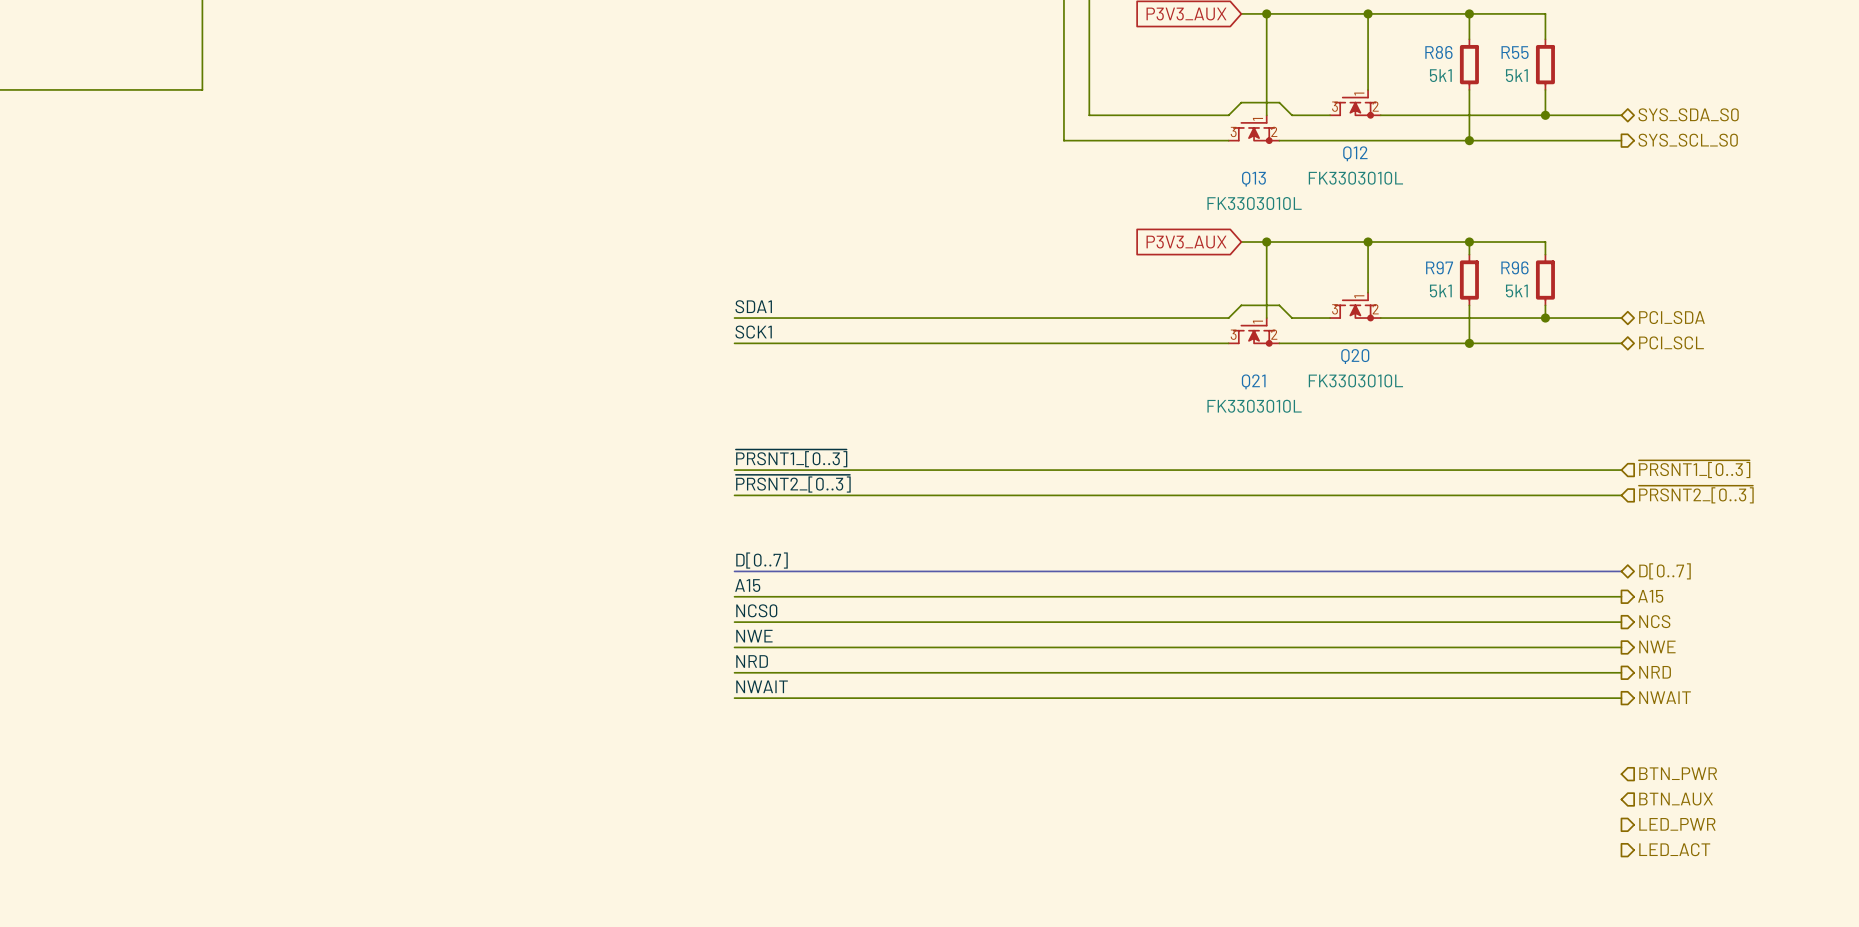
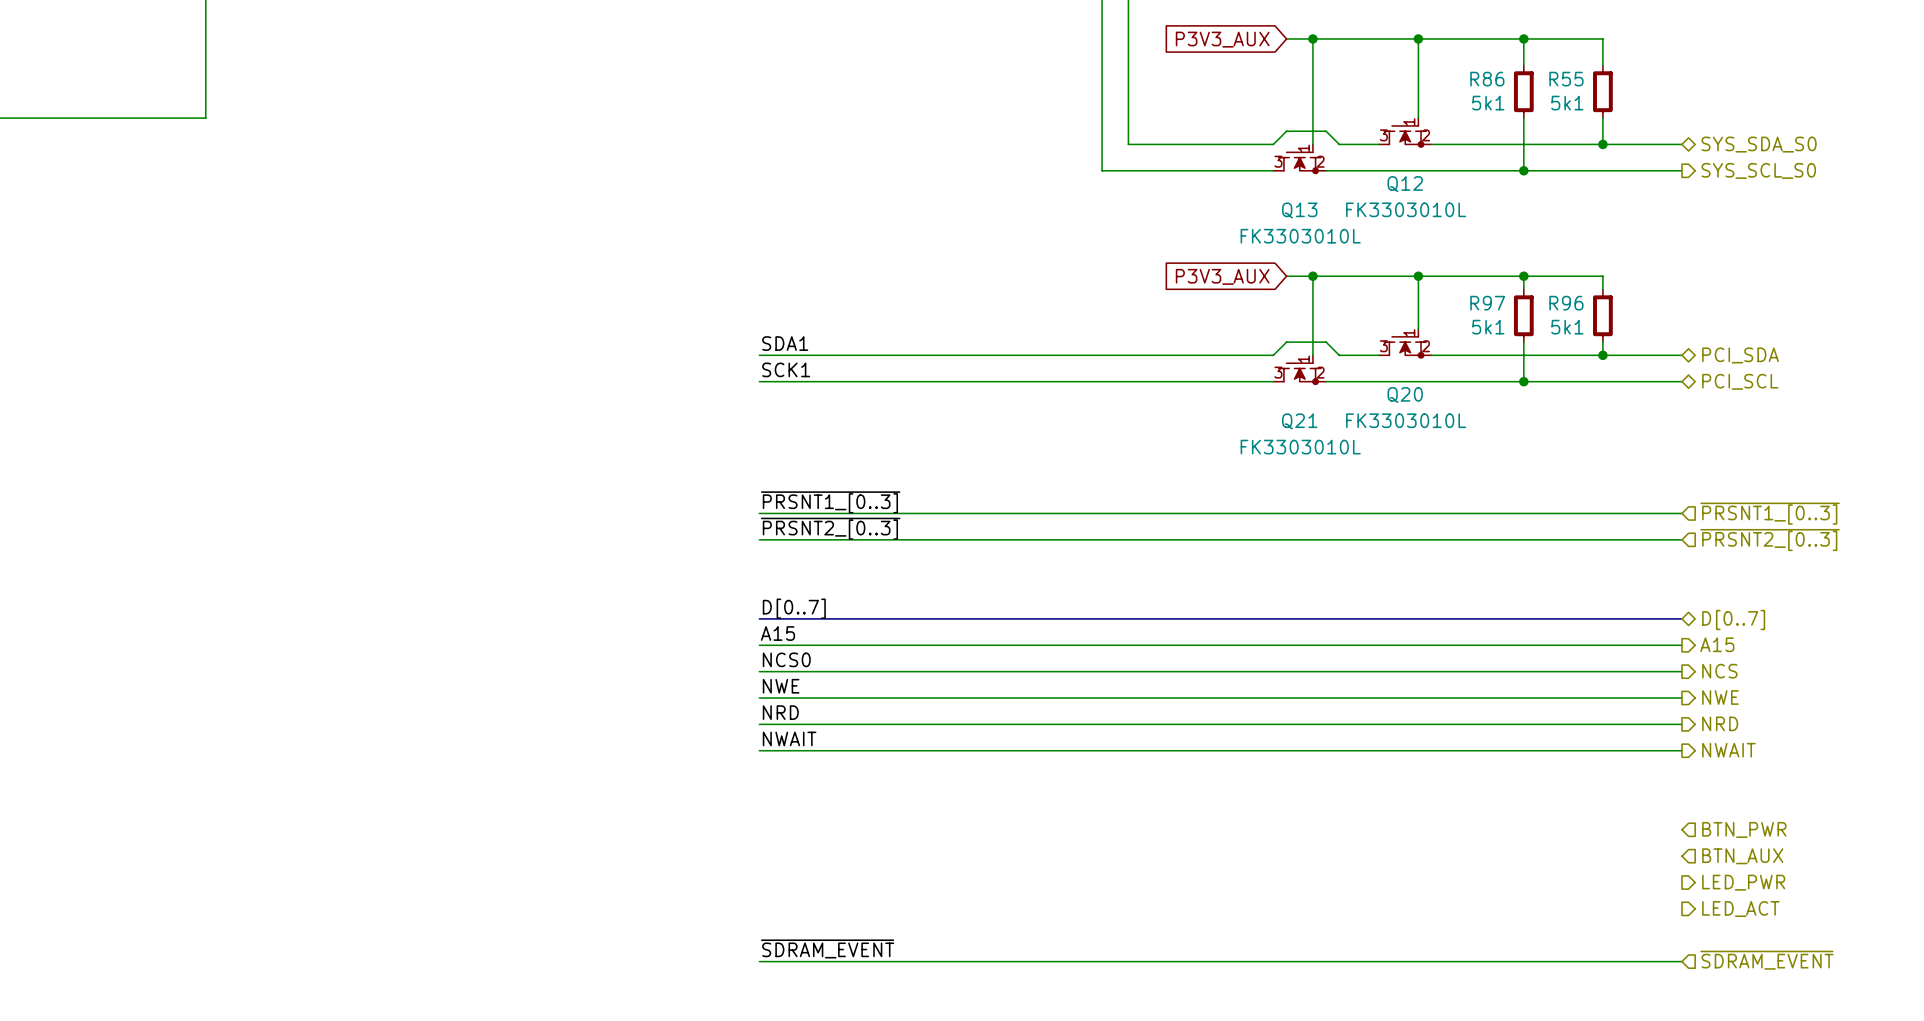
label: none -> ~{SDRAM_EVENT} (827, 948)
hierarchical label: none -> ~{SDRAM_EVENT} (1766, 960)
wire: none -> (759, 961) (1681, 961)

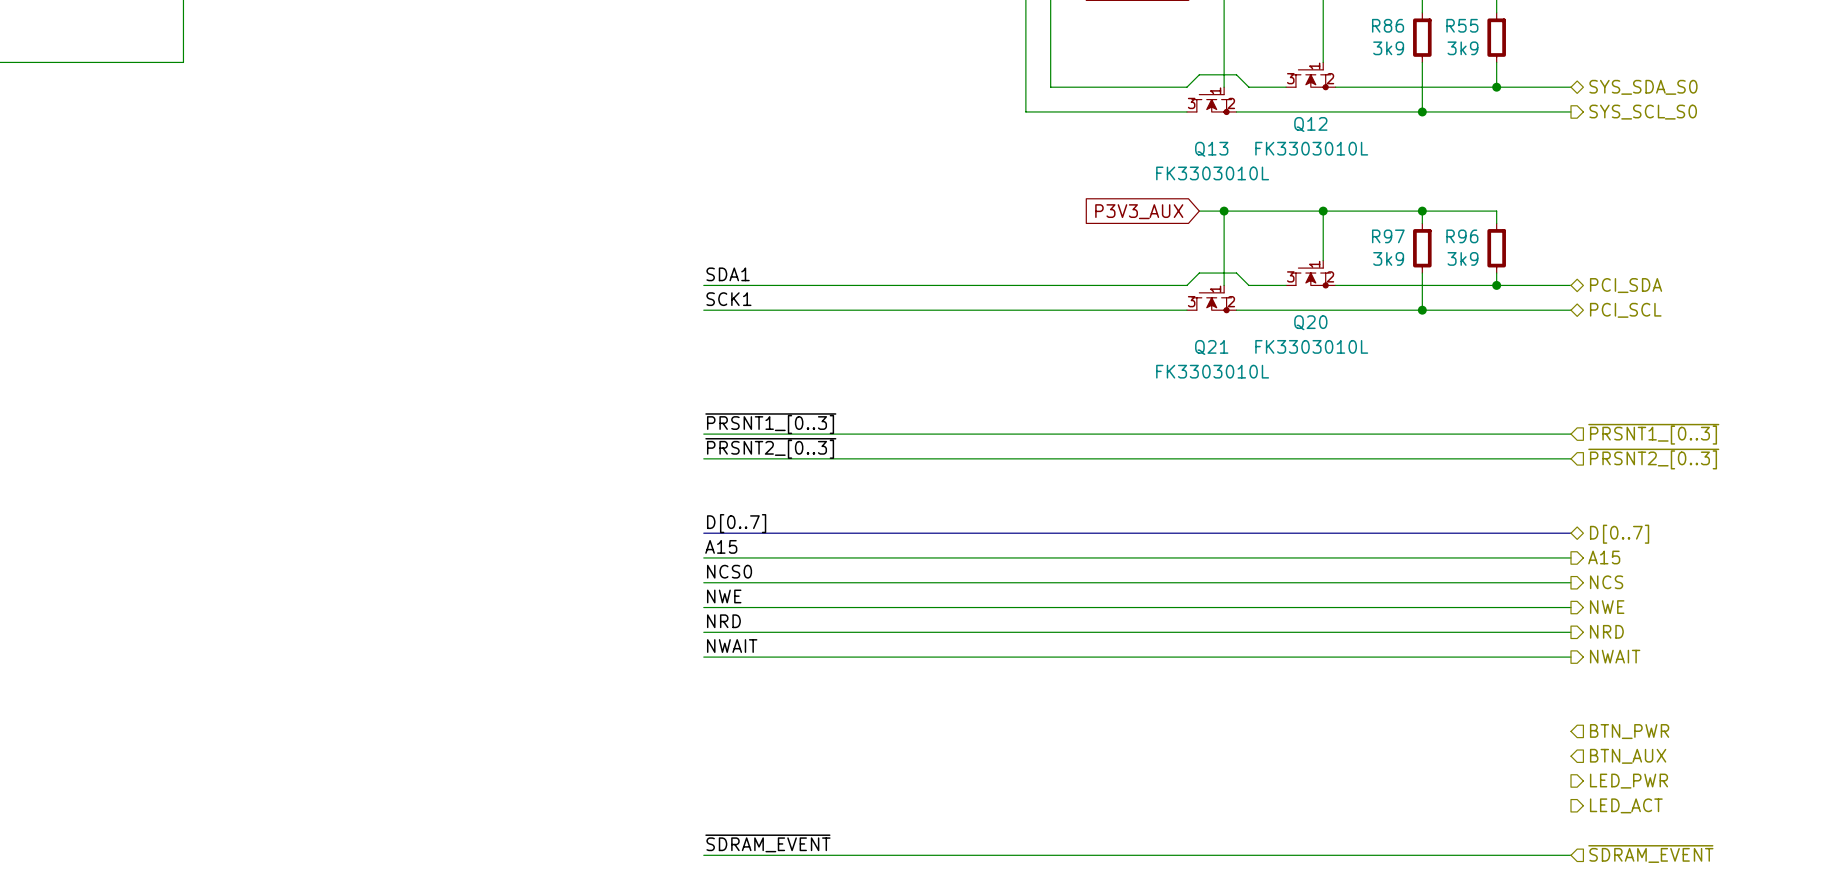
R86 value: 5k1 (1488, 103) -> 3k9 (1388, 48)
R55 value: 5k1 (1567, 103) -> 3k9 (1462, 48)
R97 value: 5k1 (1488, 327) -> 3k9 (1388, 258)
R96 value: 5k1 (1567, 327) -> 3k9 (1462, 258)

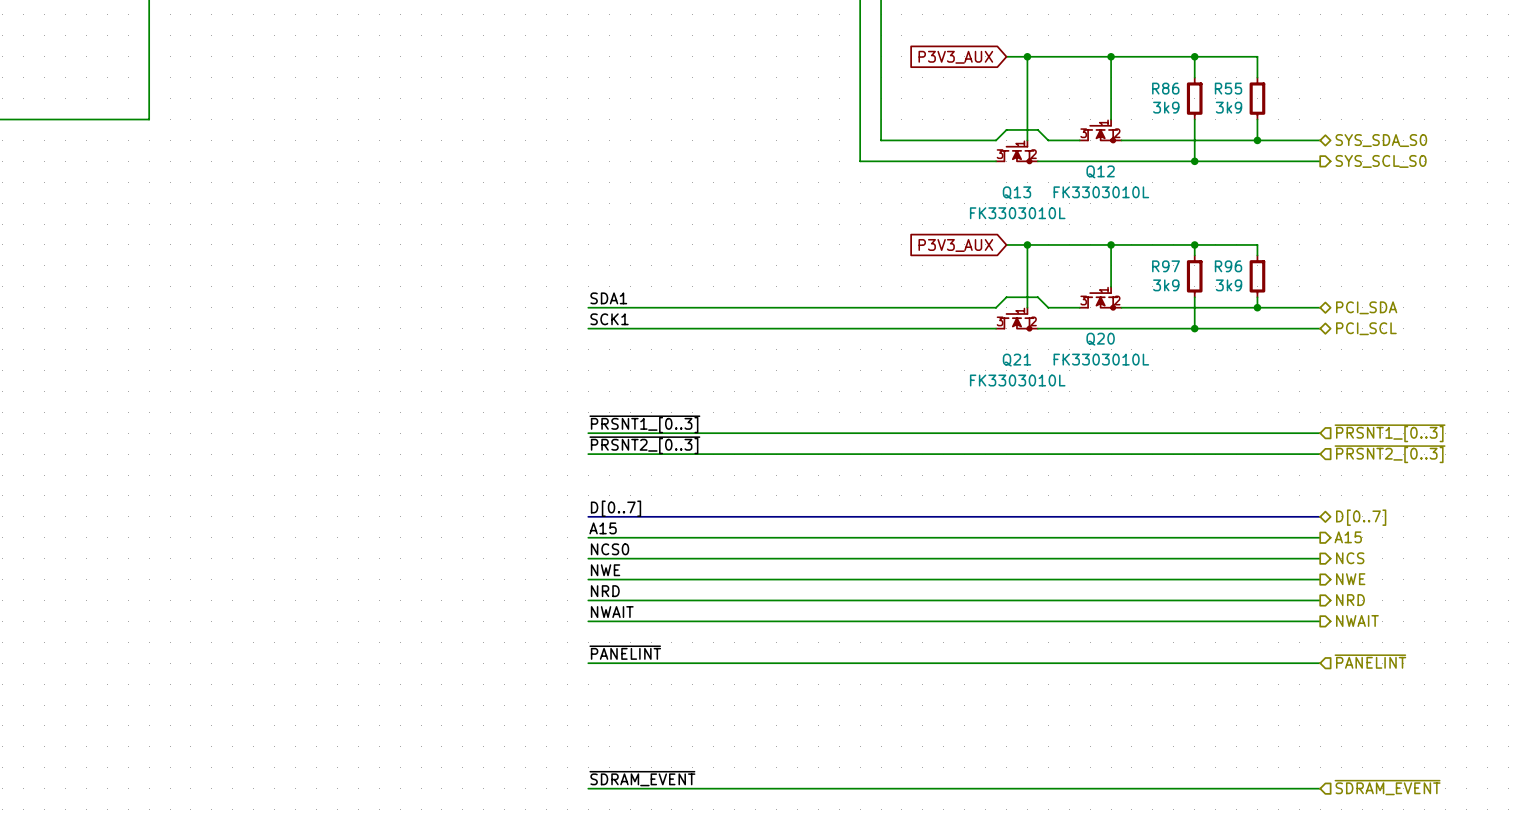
label: none -> ~{PANELINT} (625, 652)
hierarchical label: none -> ~{PANELINT} (1370, 661)
wire: none -> (588, 663) (1320, 663)
hierarchical label: BTN_PWR (1629, 731) -> none
hierarchical label: BTN_AUX (1628, 756) -> none
hierarchical label: LED_PWR (1629, 781) -> none
hierarchical label: LED_ACT (1626, 805) -> none

